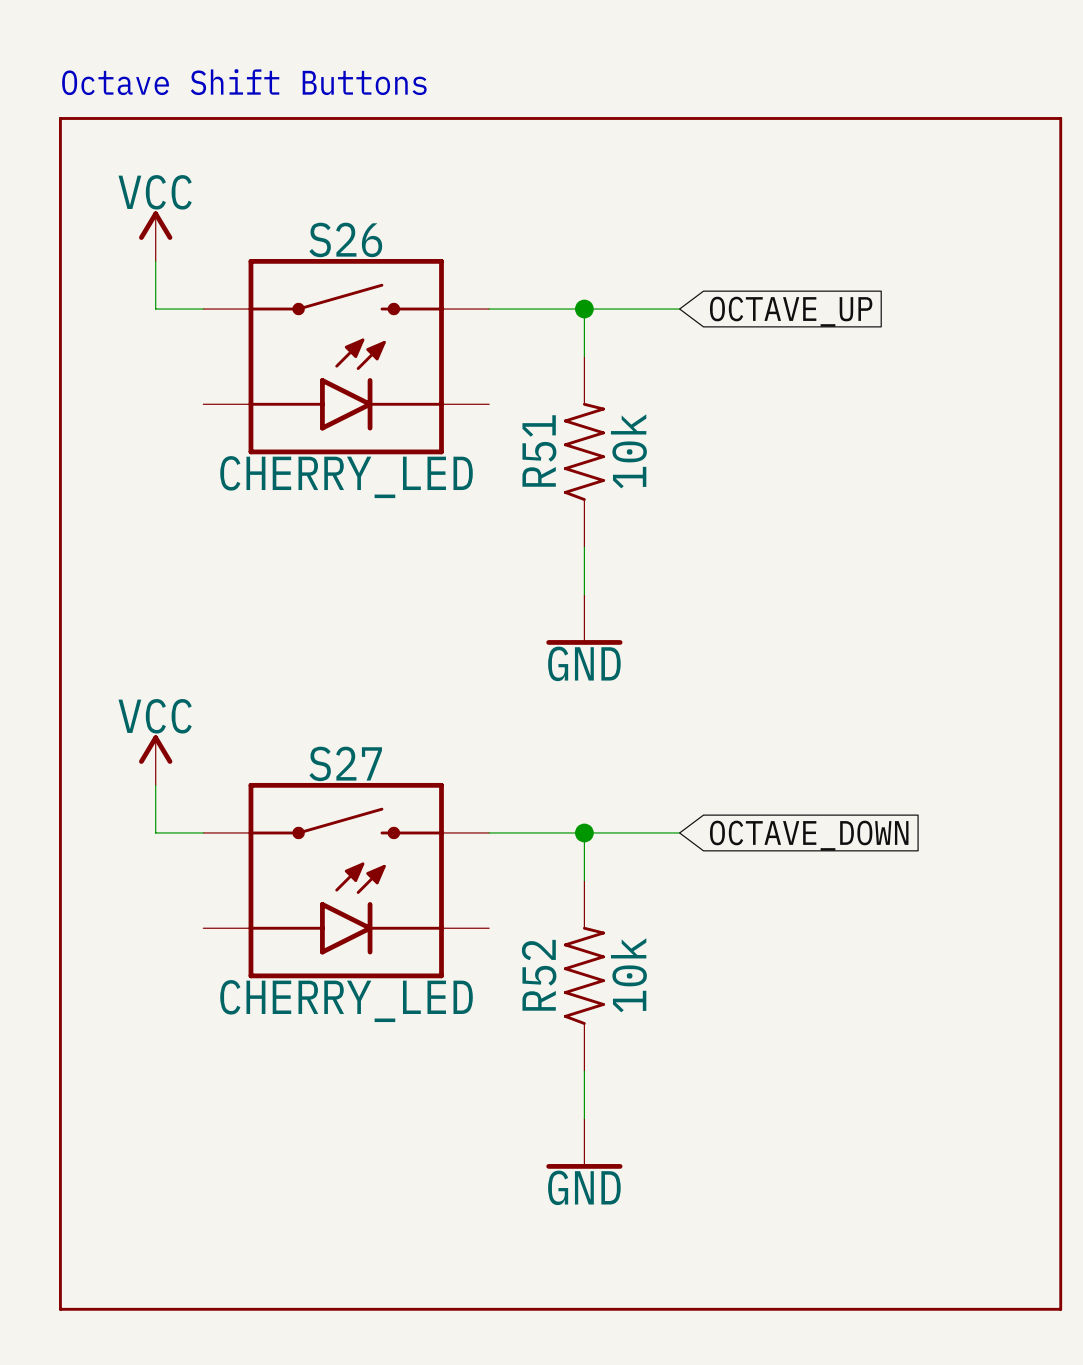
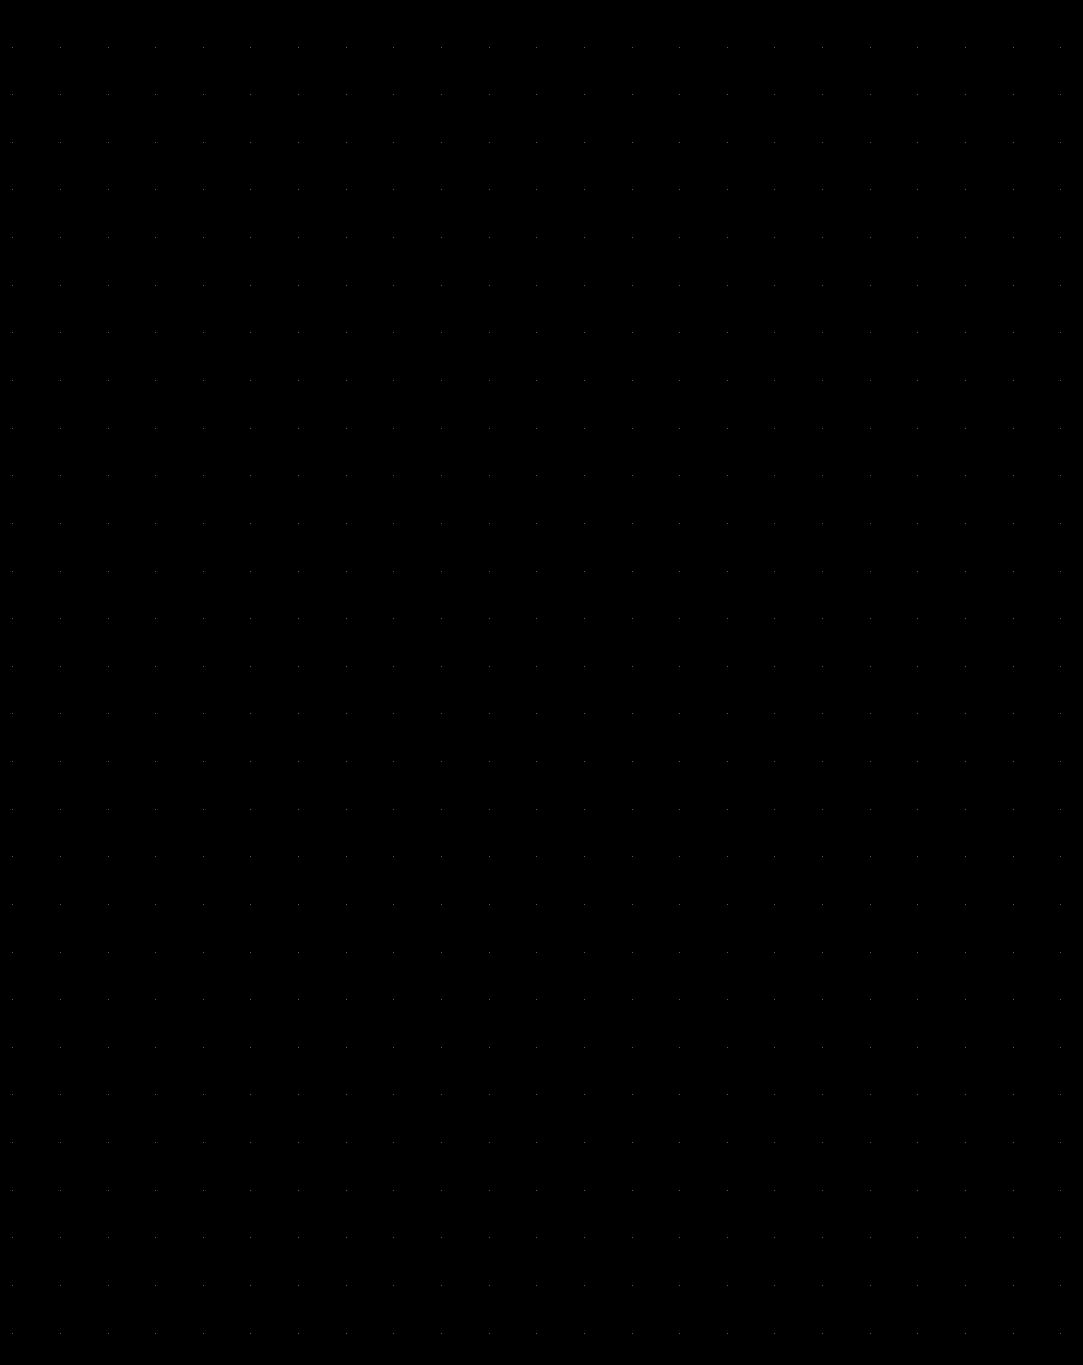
text: Octave Shift Buttons (244, 82) -> none
line: (60, 118) (1060, 118) (1060, 1309) (60, 1309) (60, 118) -> none
power symbol: VCC (155, 236) -> none
wire: (155, 261) (155, 309) (203, 309) -> none
wire: (489, 309) (679, 309) -> none
wire: (584, 309) (584, 356) -> none
junction: (584, 309) -> none
global label: OCTAVE_UP (791, 311) -> none
S26: CHERRY_LED (346, 356) -> none
R51: 10k (584, 451) -> none
wire: (584, 547) (584, 594) -> none
power symbol: GND (584, 619) -> none
power symbol: VCC (155, 760) -> none
wire: (155, 785) (155, 832) (203, 832) -> none
wire: (489, 832) (679, 832) -> none
wire: (584, 832) (584, 880) -> none
junction: (584, 832) -> none
global label: OCTAVE_DOWN (809, 835) -> none
S27: CHERRY_LED (346, 880) -> none
R52: 10k (584, 975) -> none
wire: (584, 1071) (584, 1118) -> none
power symbol: GND (584, 1143) -> none

